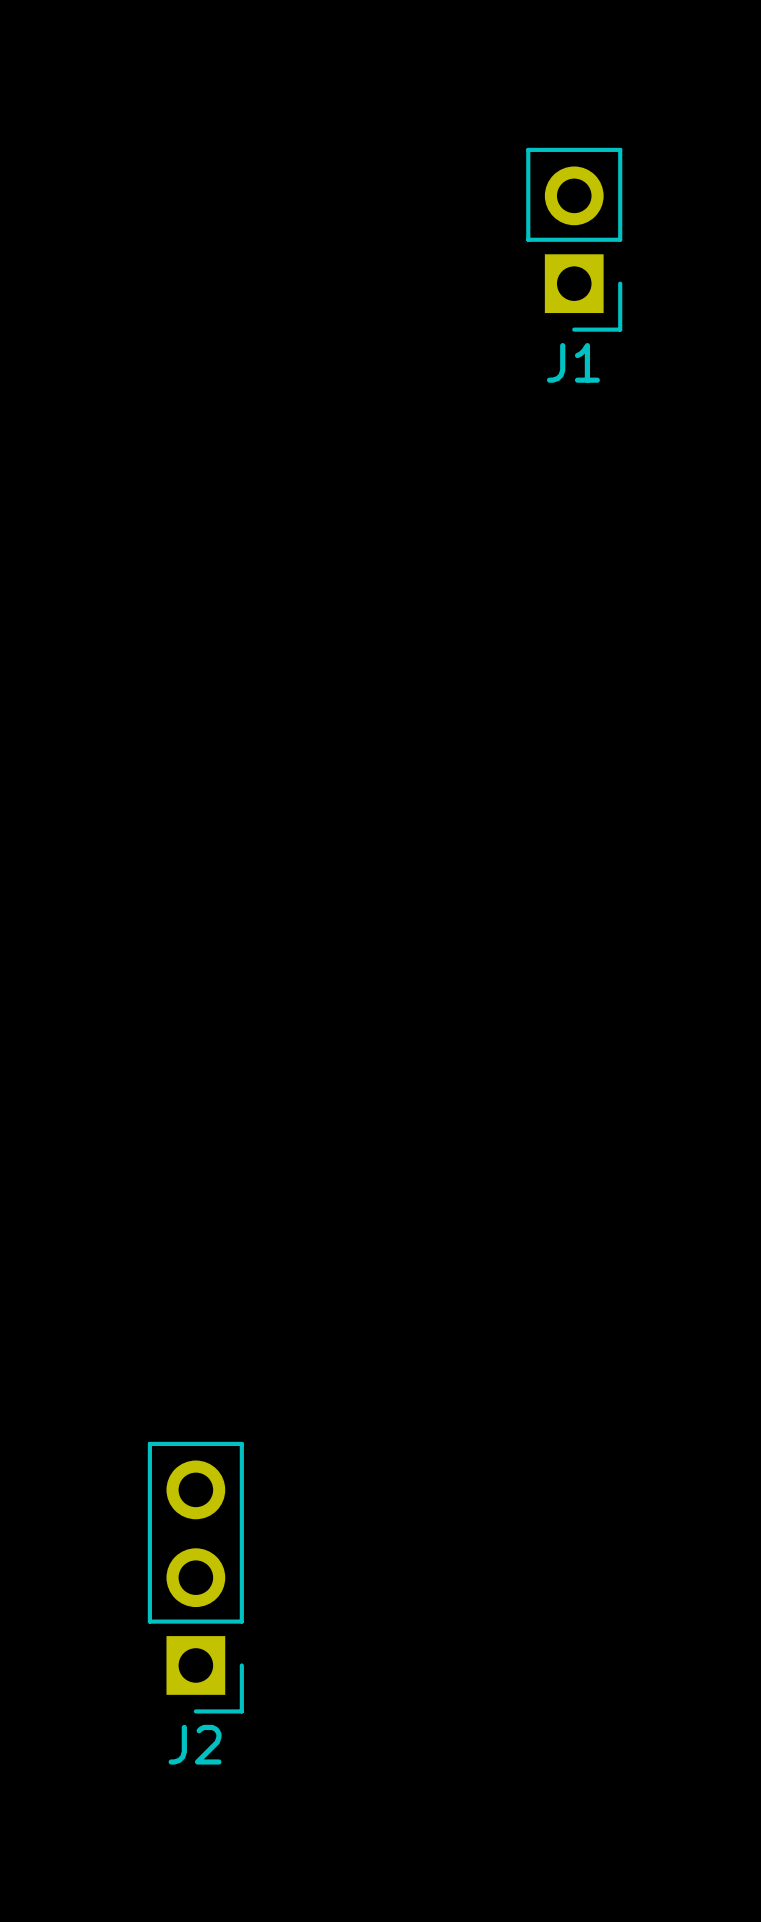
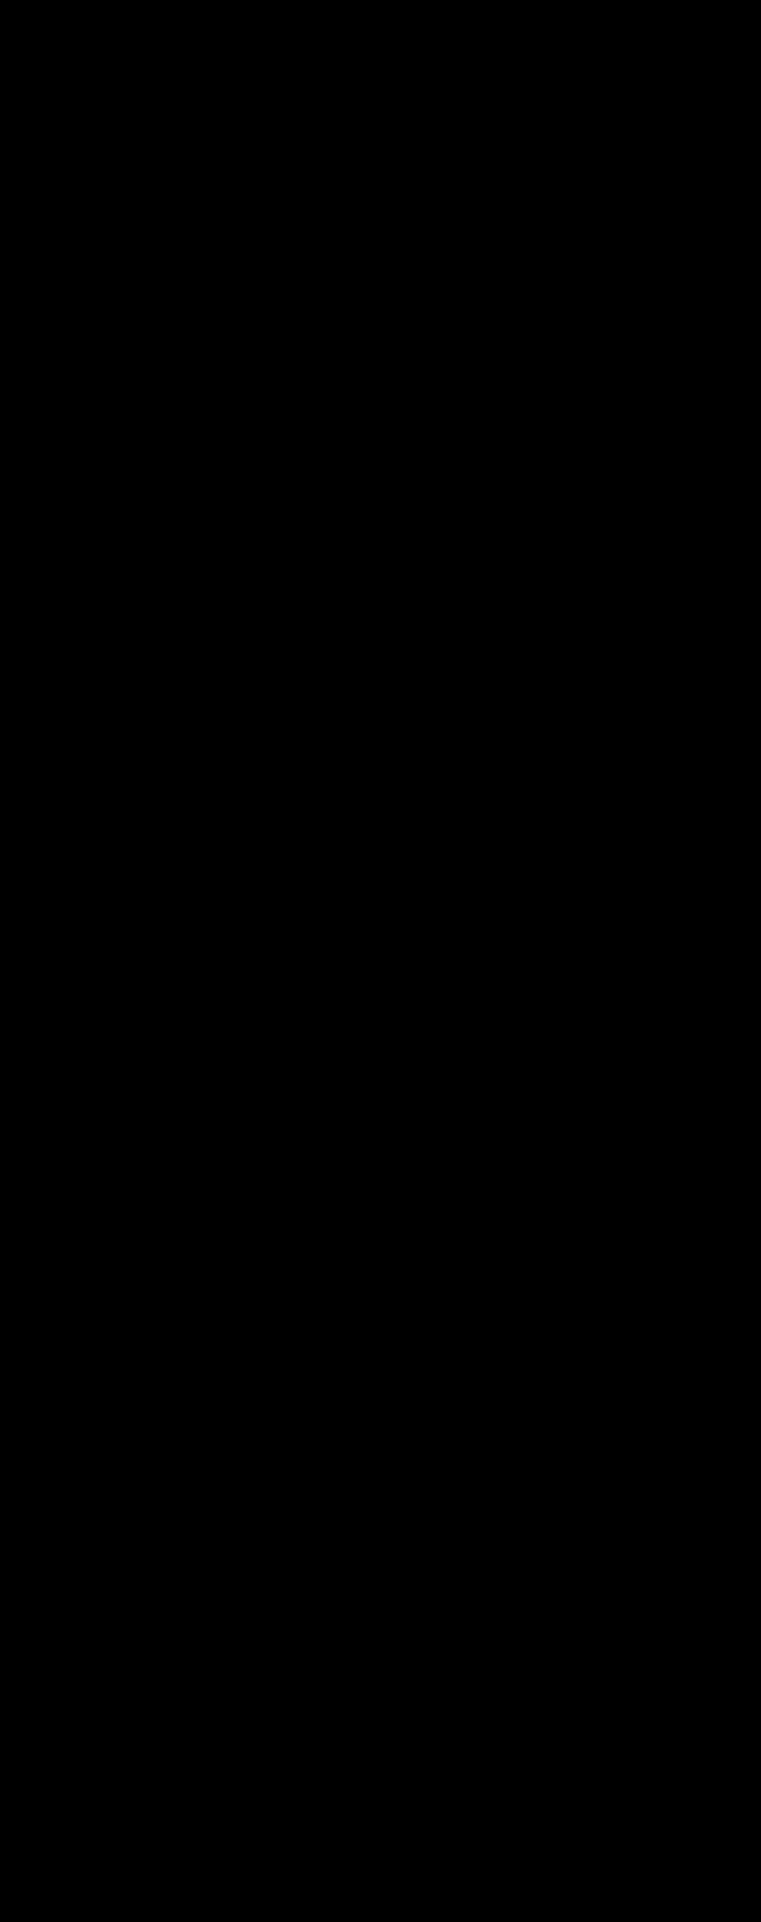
J1: (574, 239) -> none
J2: (195, 1577) -> none

